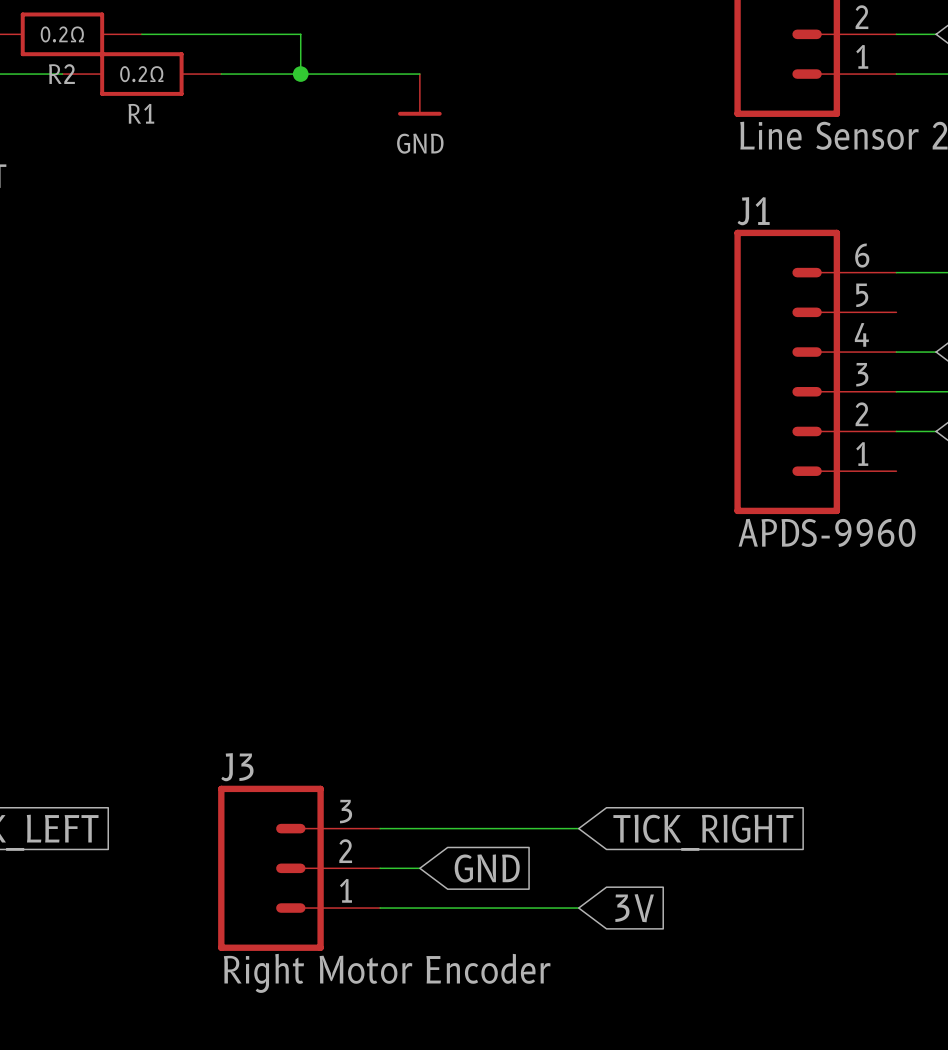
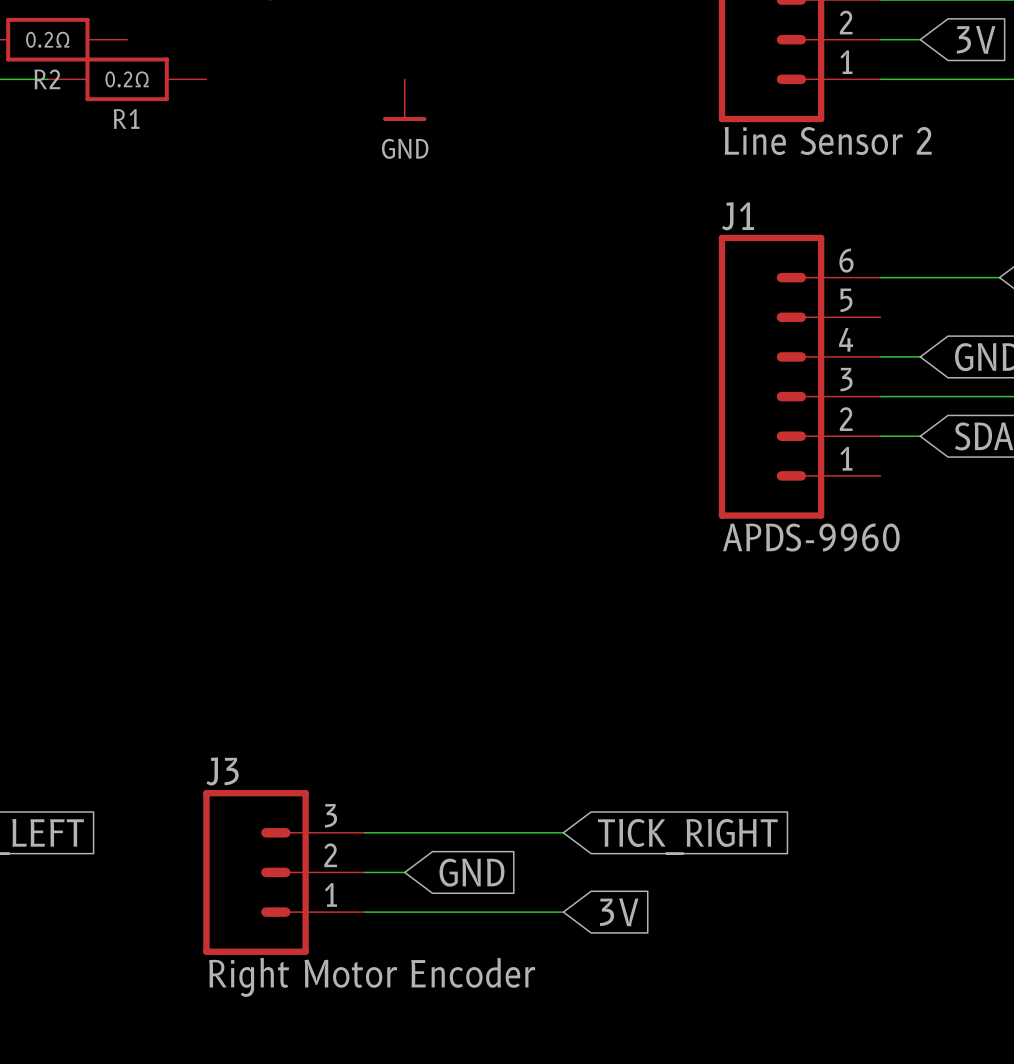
wire: (141, 34) (300, 34) (300, 74) -> none
wire: (221, 74) (419, 74) -> none
junction: (300, 74) -> none

